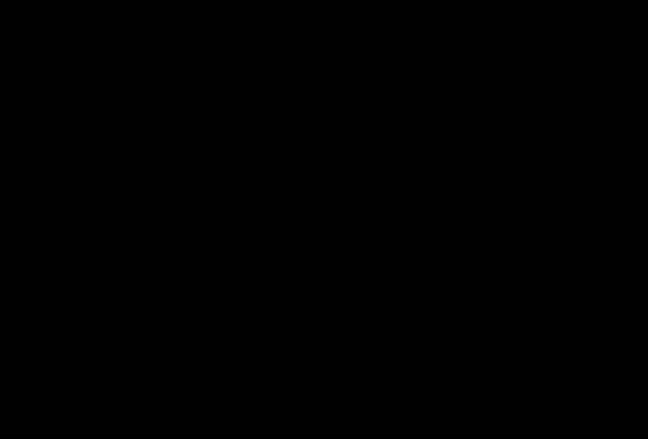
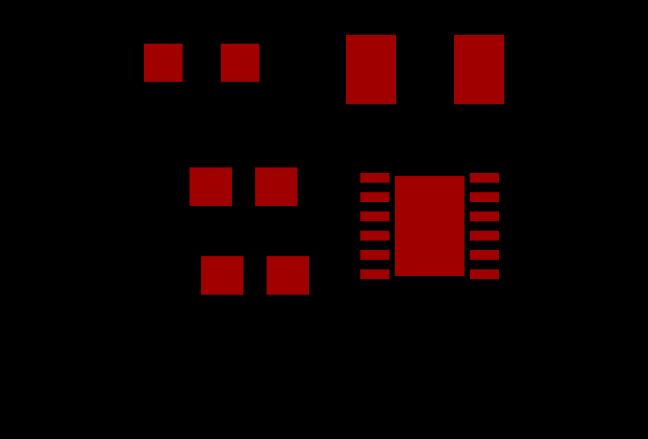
part: none -> (201, 62)
part: none -> (425, 69)
part: none -> (243, 186)
part: none -> (429, 226)
part: none -> (255, 275)

